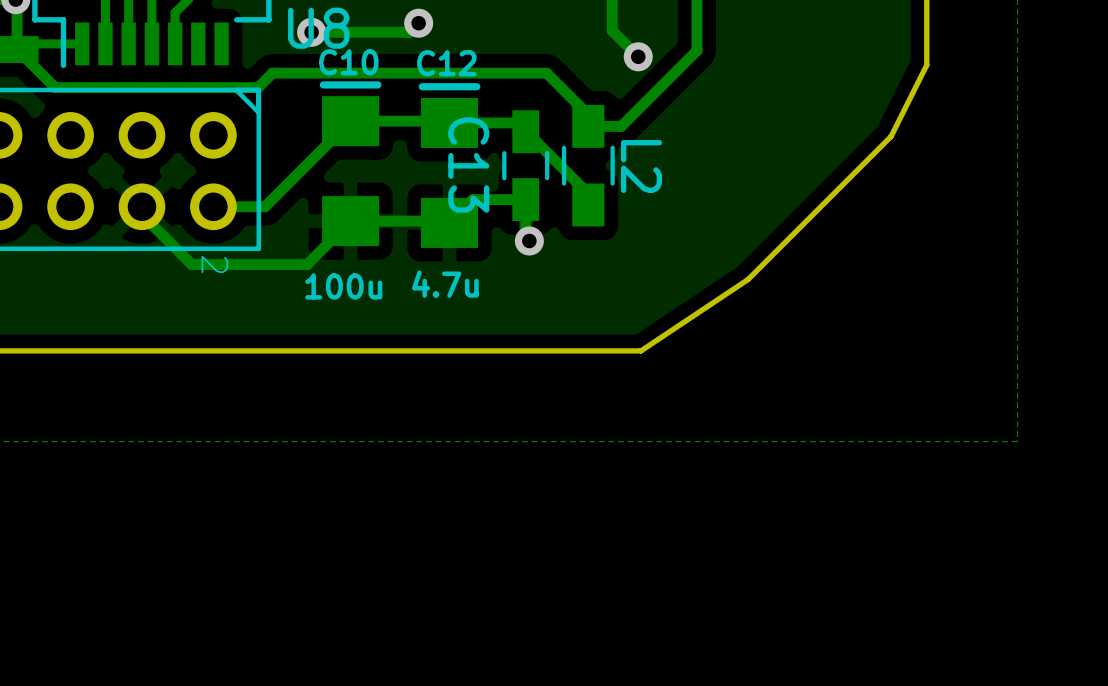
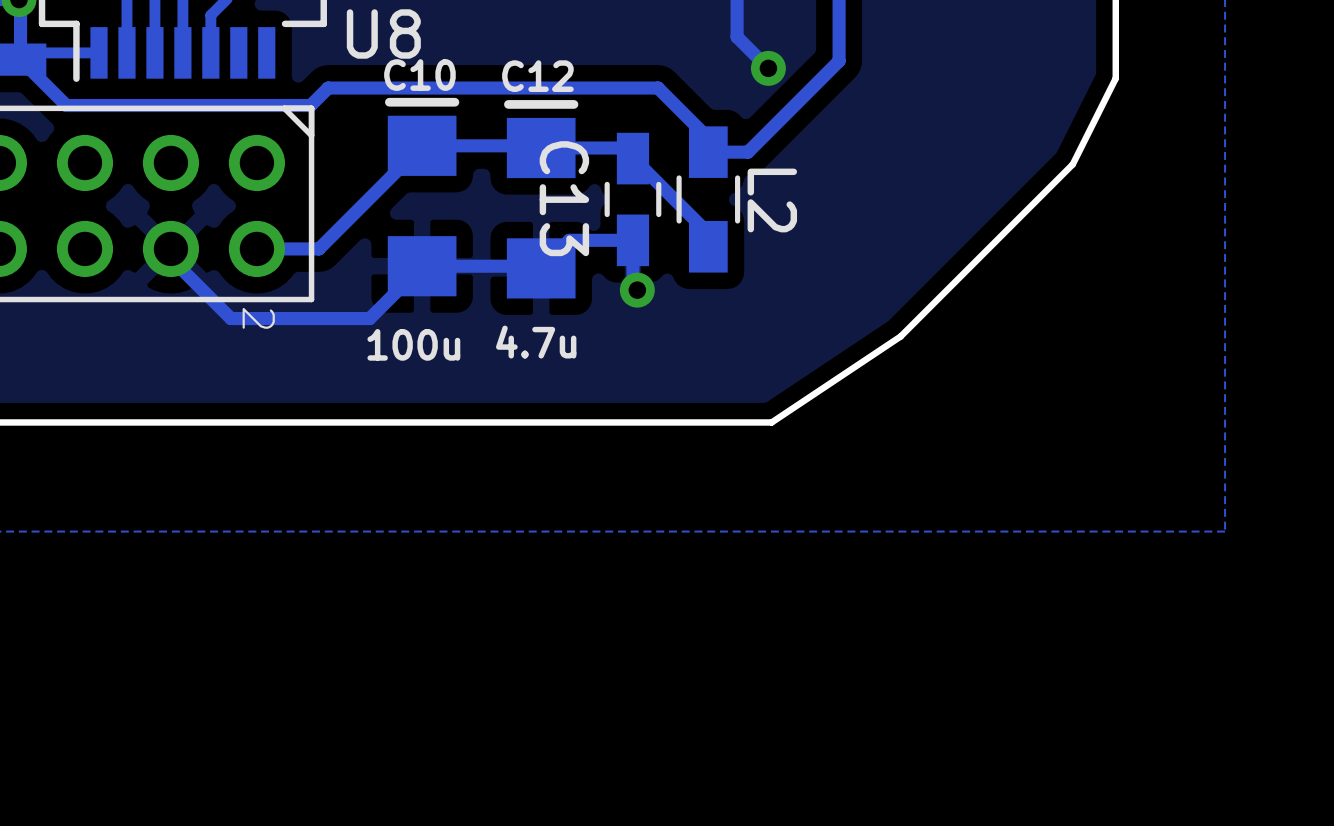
track: (418, 23) (409, 32) (311, 32) -> none
via: (418, 23) -> none
via: (311, 32) -> none

